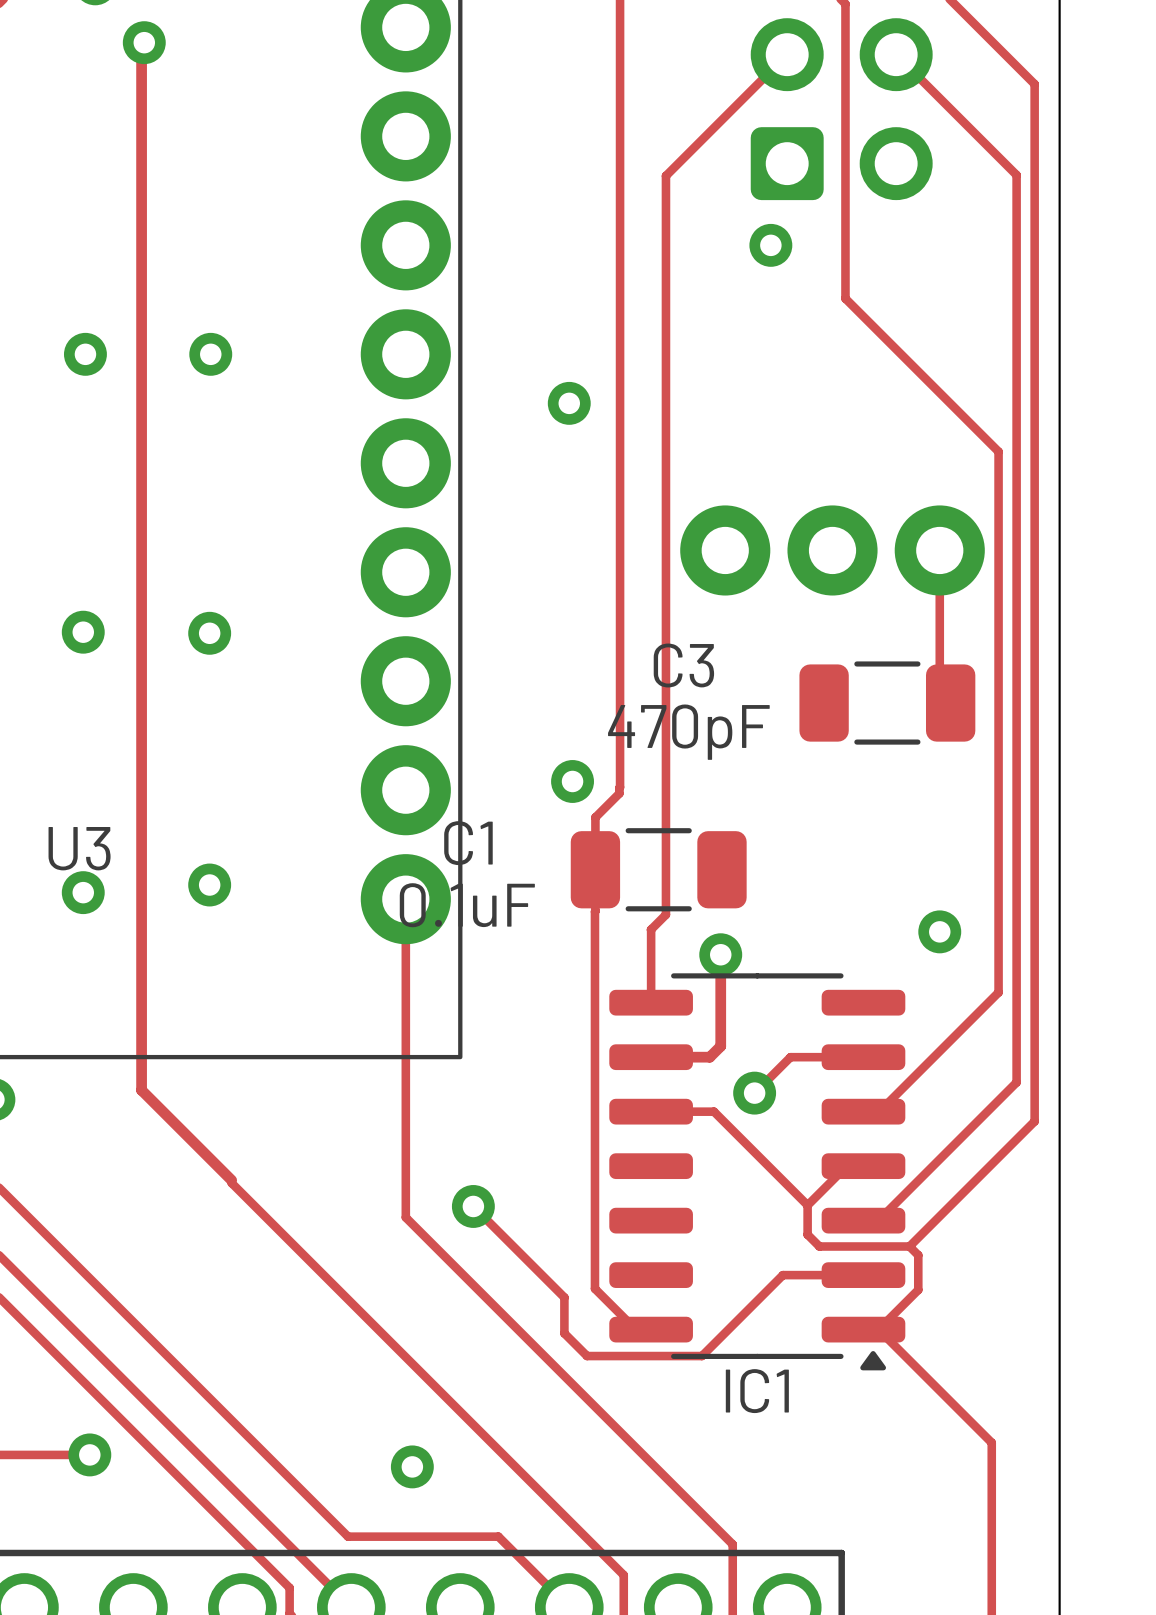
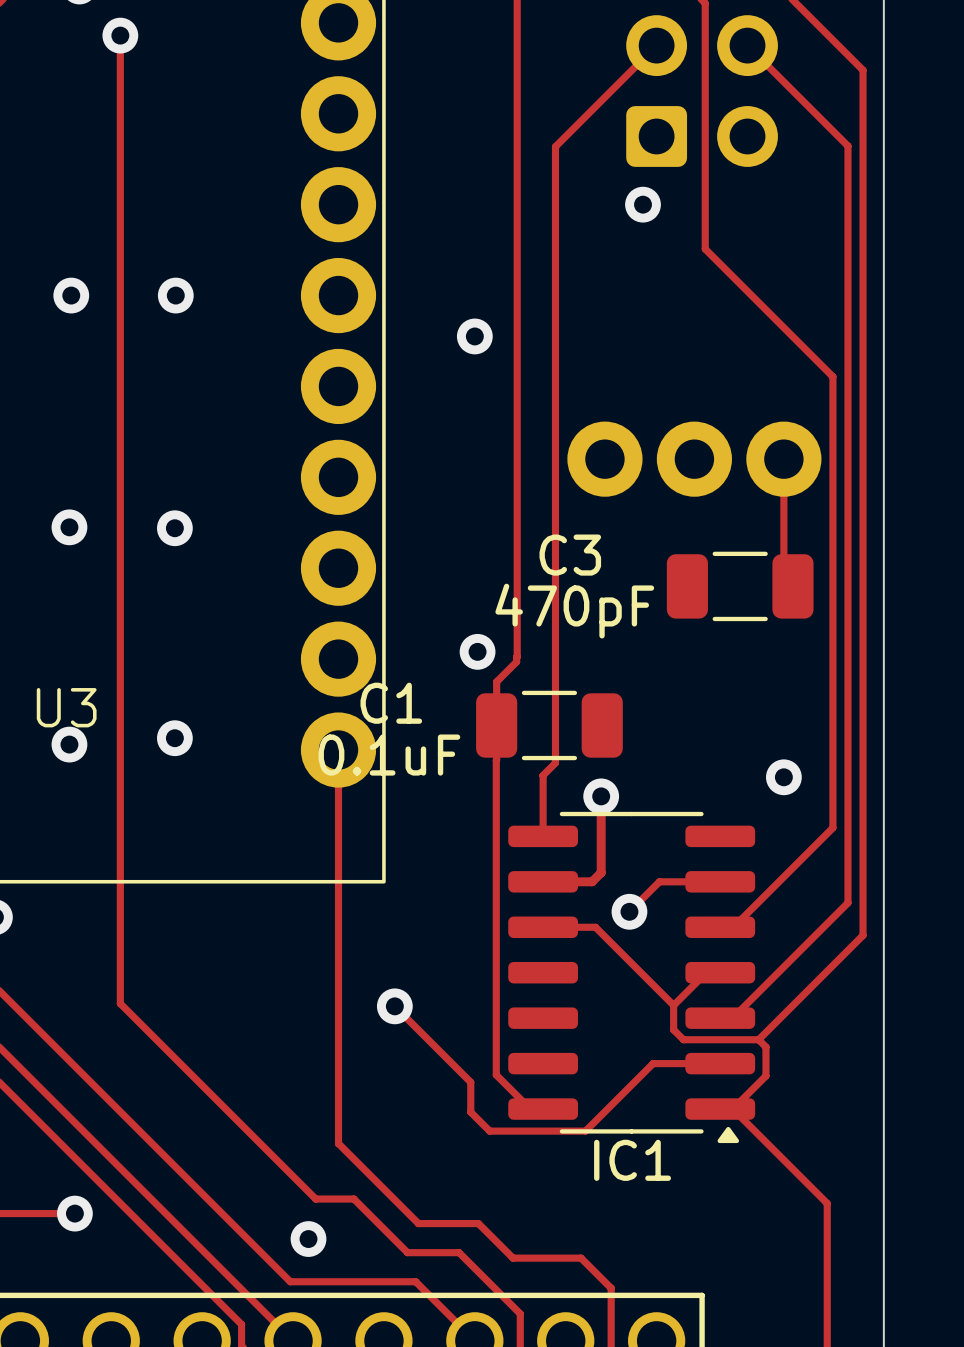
track: (144, 42) (141, 45) (141, 1090) (550, 1501) -> (120, 35) (120, 1003) (315, 1199) (353, 1199) (407, 1252) (459, 1252)
track: (405, 1217) (696, 1508) -> (338, 1015) (338, 1143) (418, 1223) (478, 1223) (513, 1258) (581, 1258)
via position: (412, 1466) -> (308, 1239)

